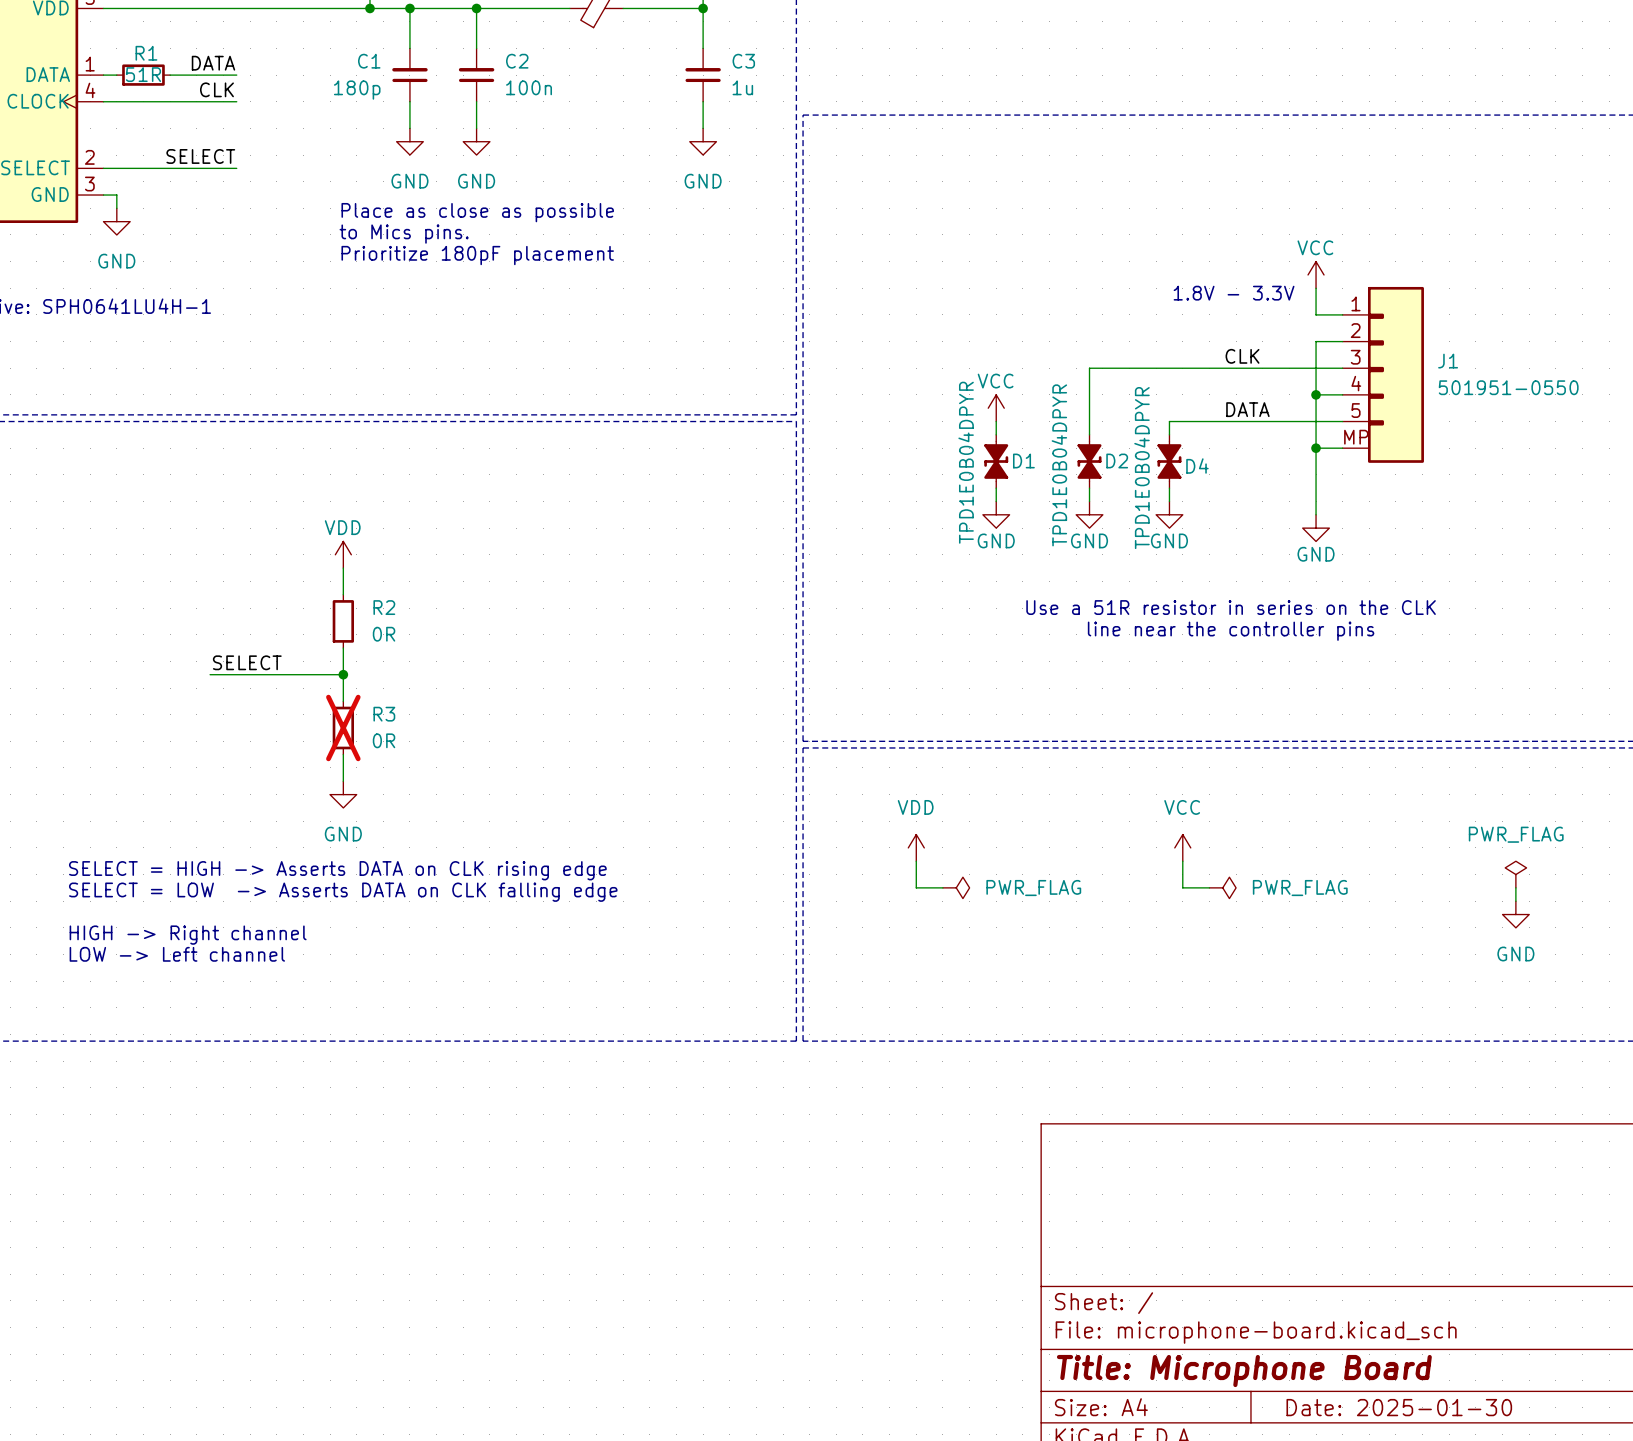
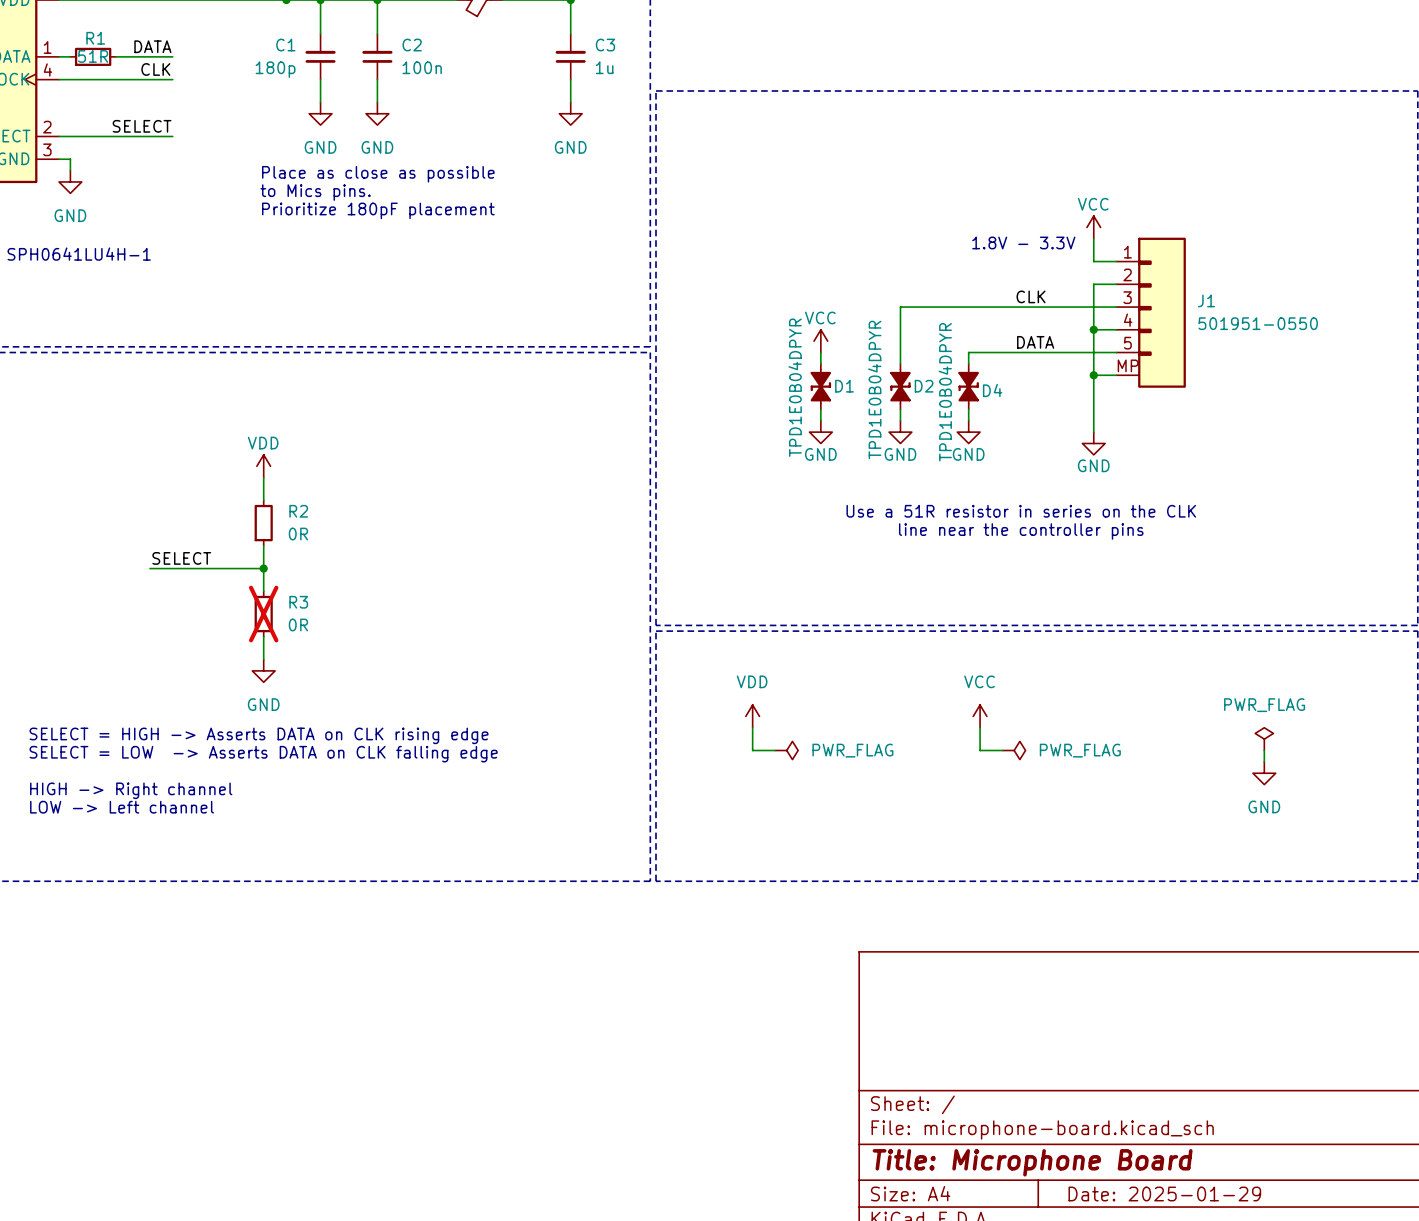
title block: Date: 2025-01-30 (1399, 1407) -> Date: 2025-01-29 (1164, 1194)

